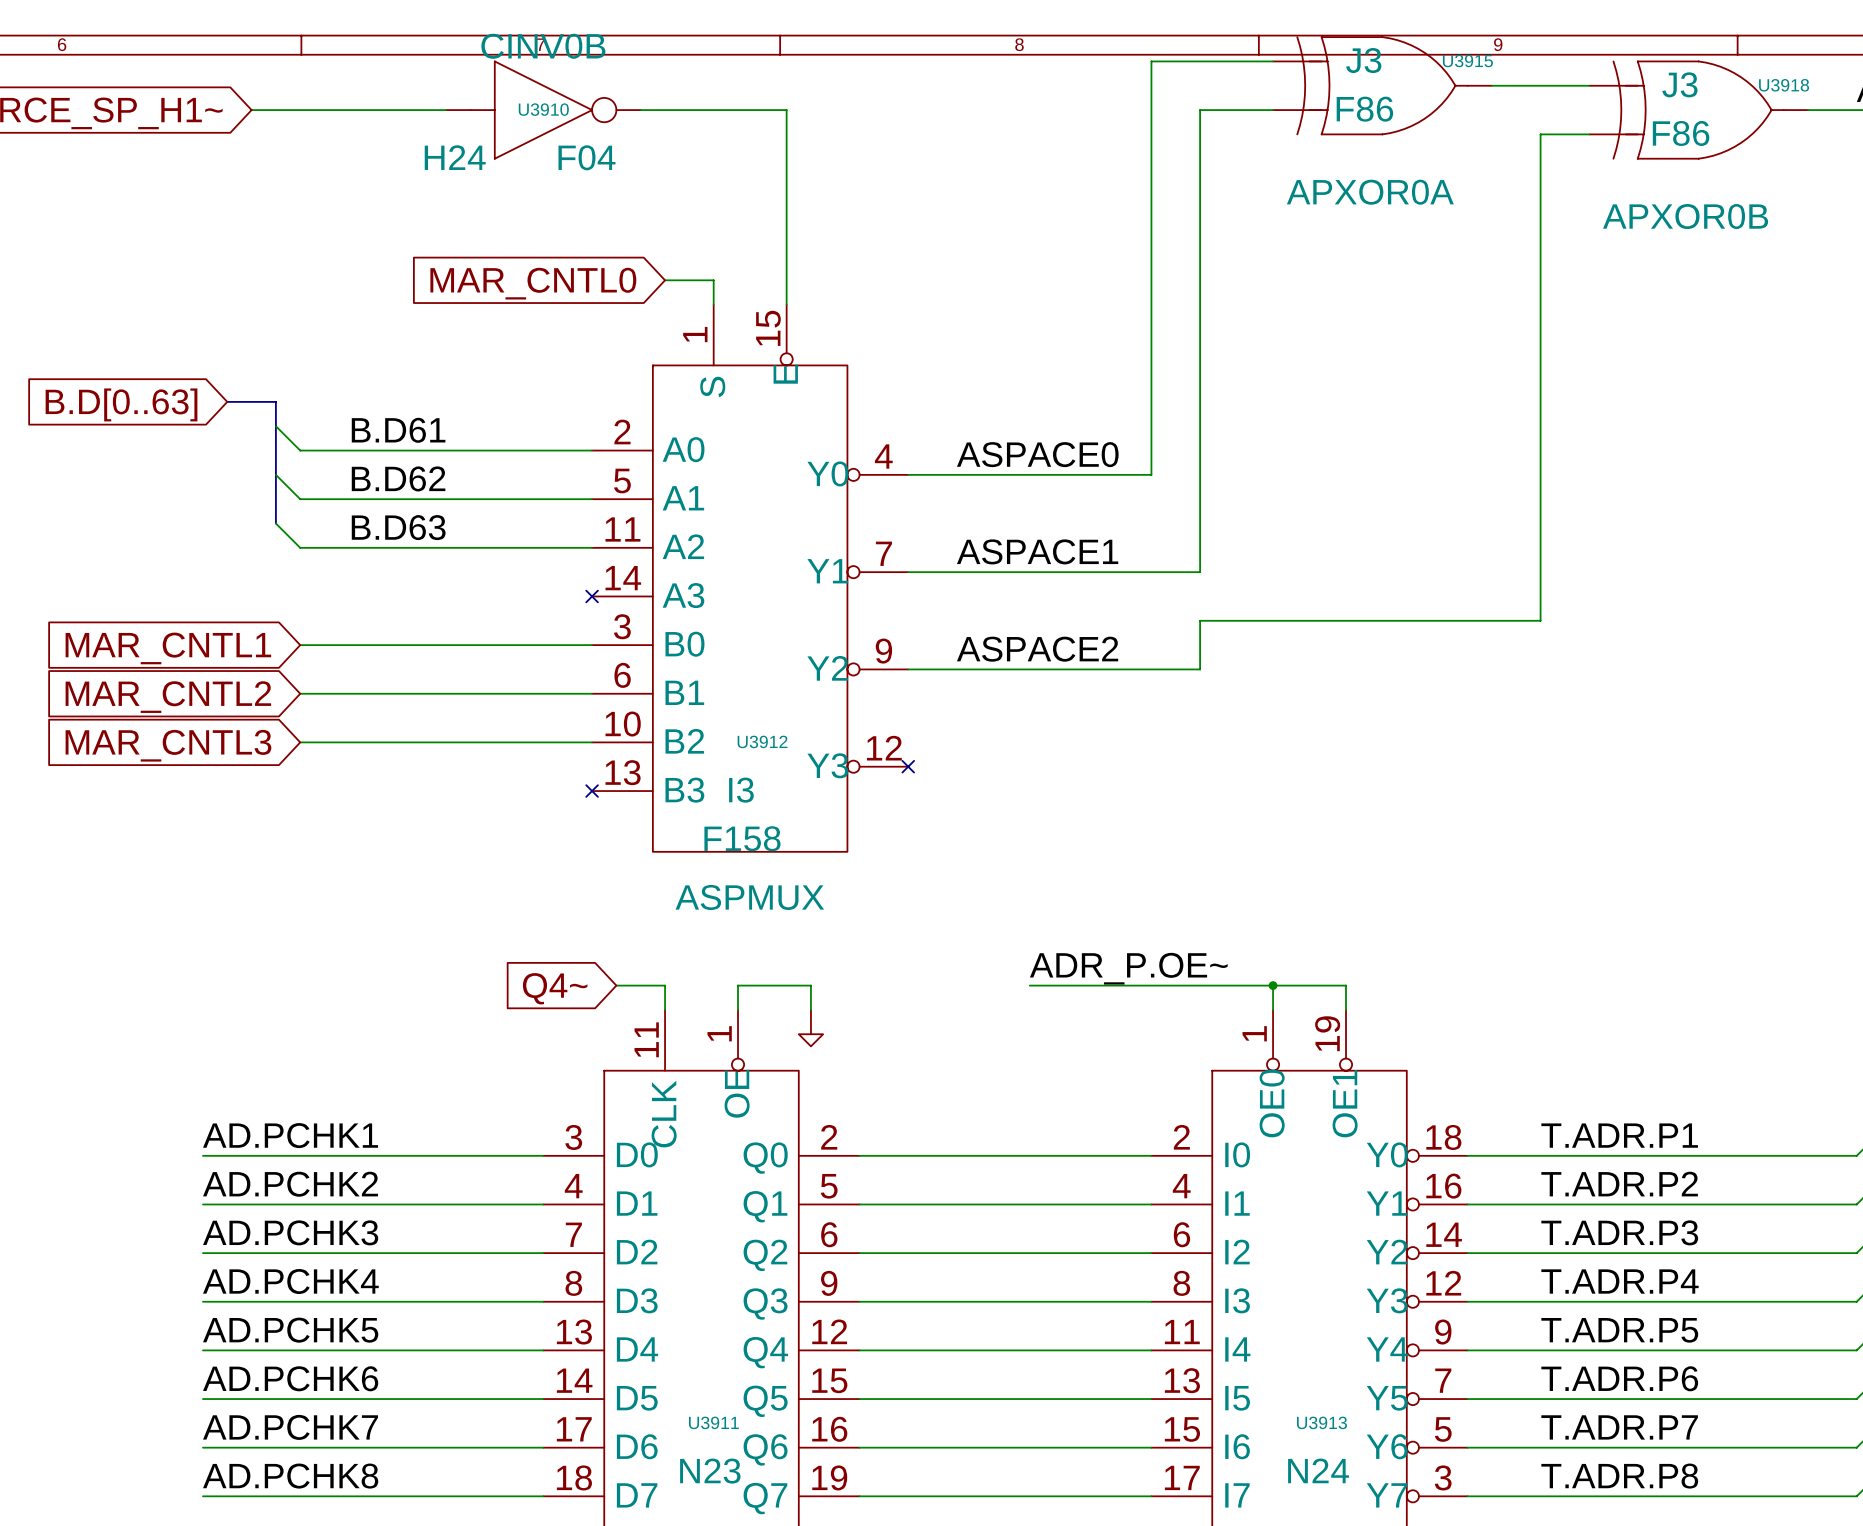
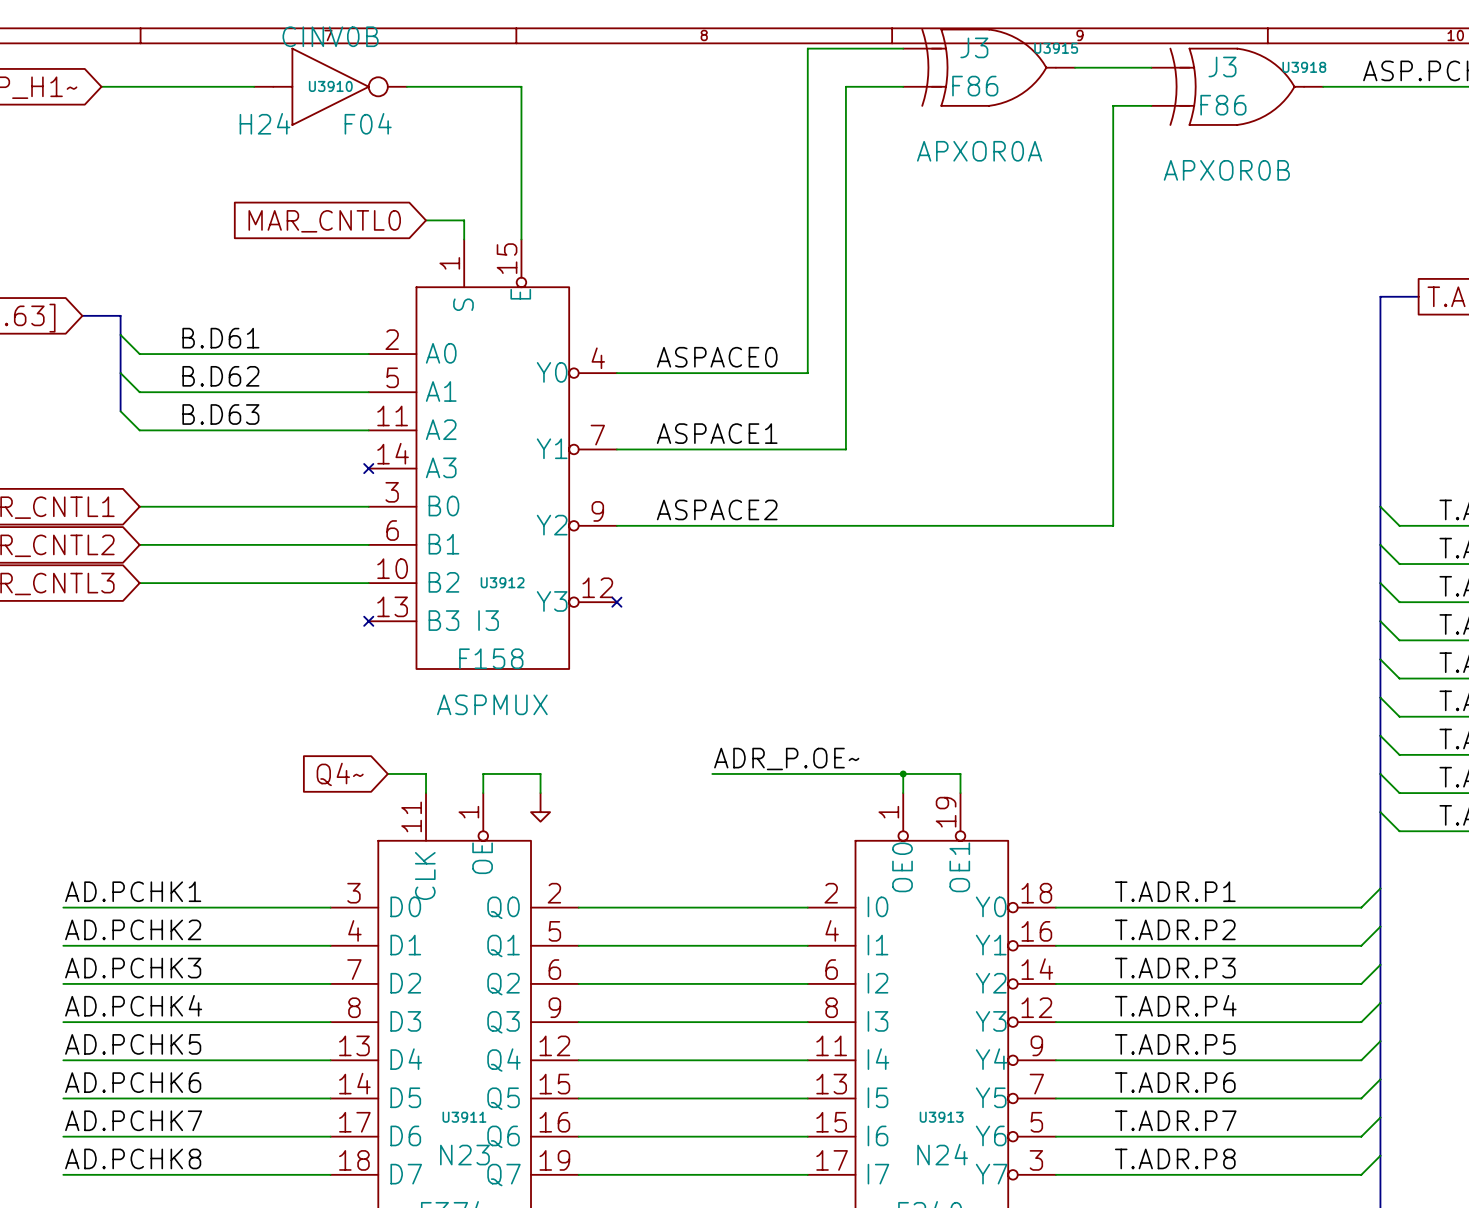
wire: (1540, 620) (1200, 620) (1200, 669) -> (1113, 487) (1113, 525) (845, 525)

